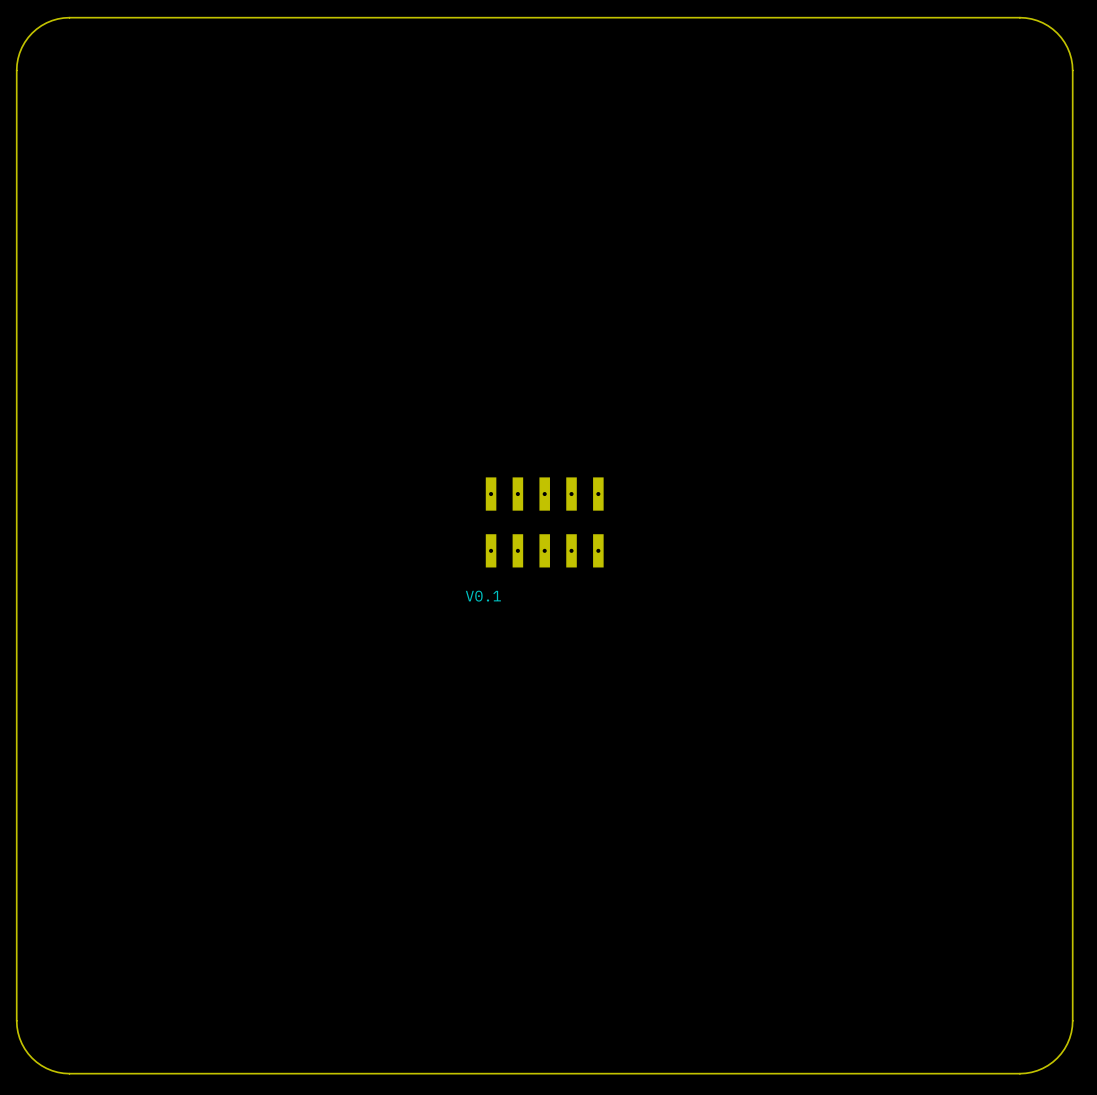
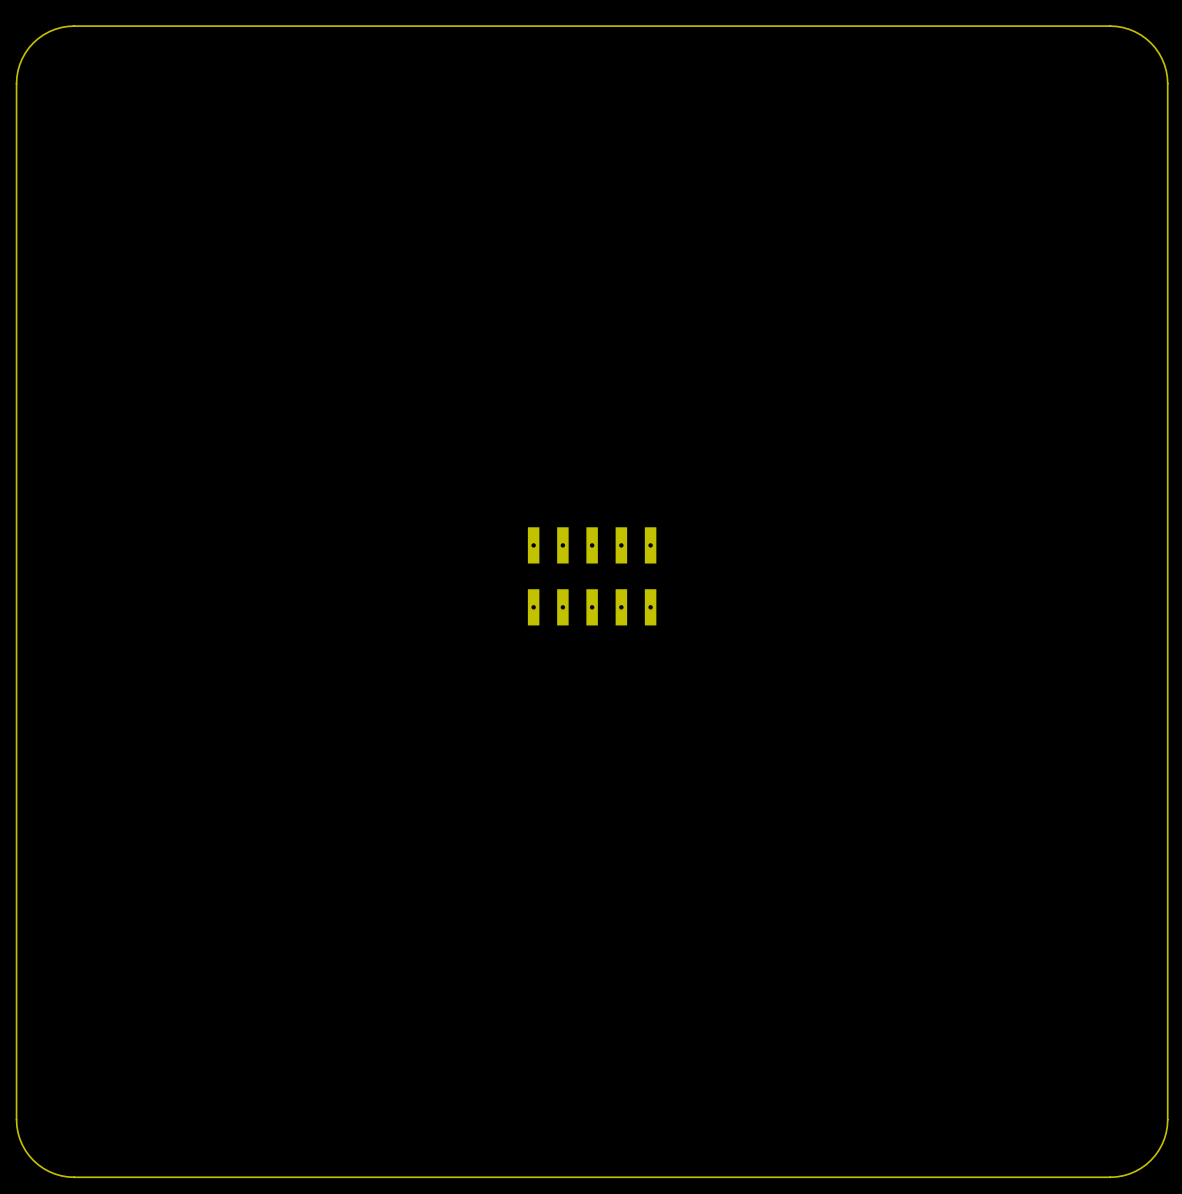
text: V0.1 (483, 596) -> none

